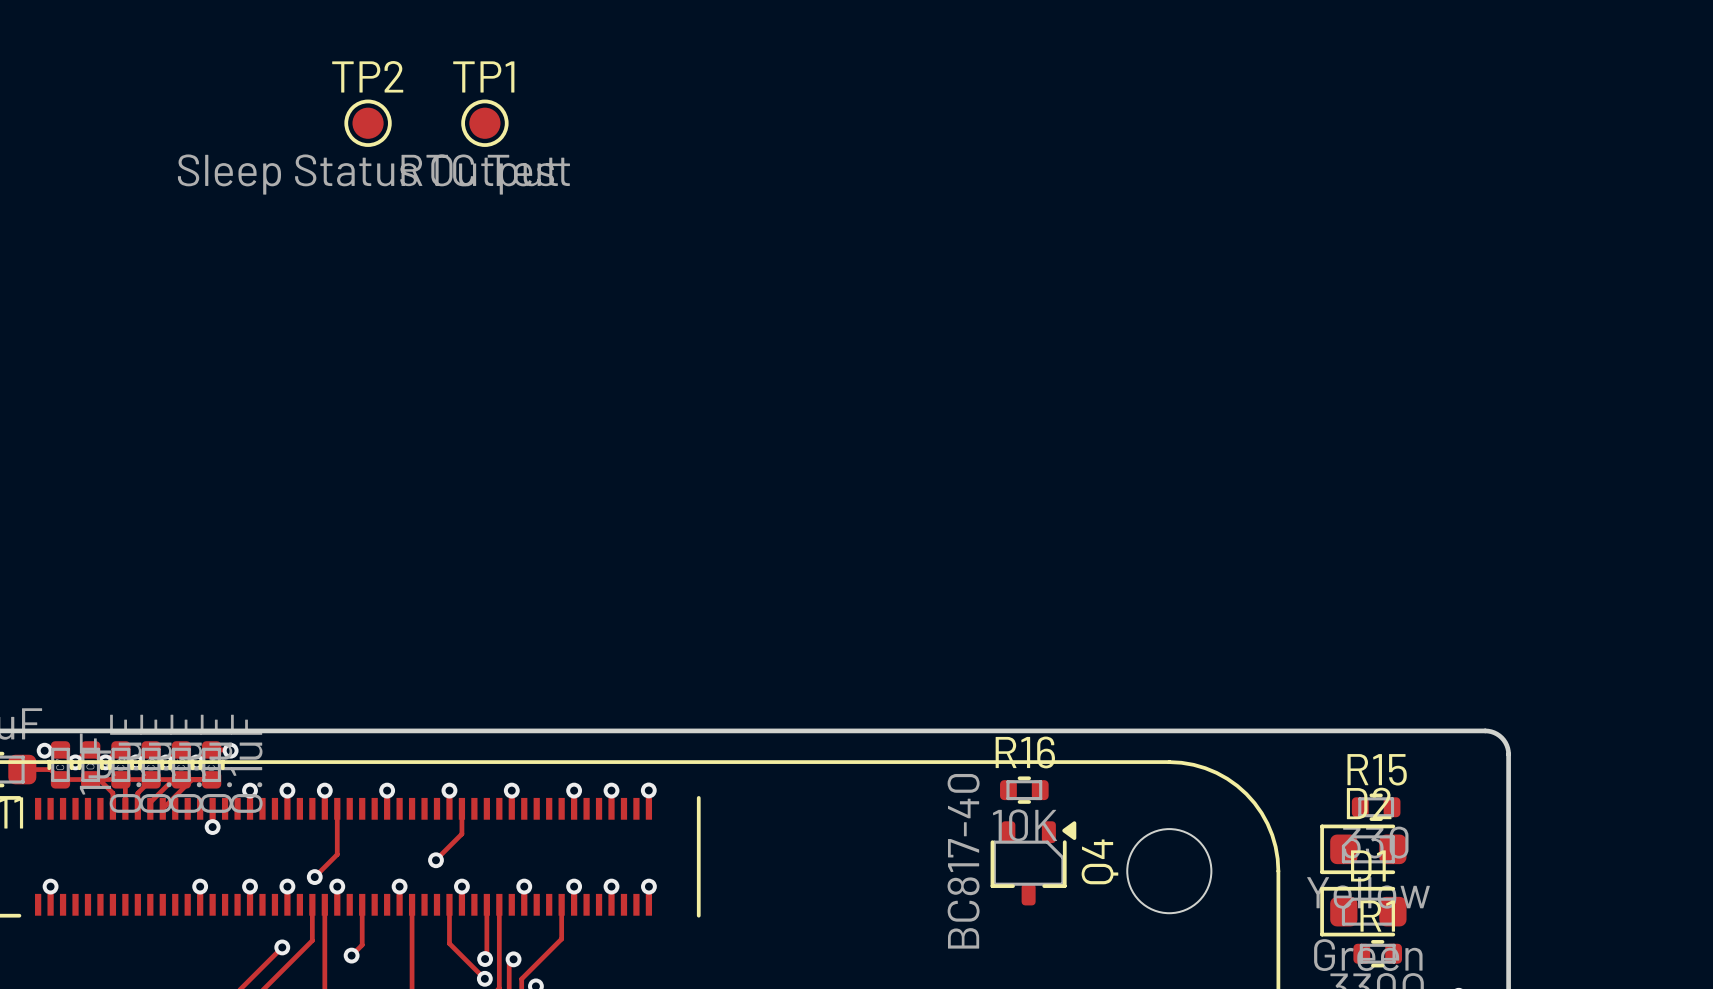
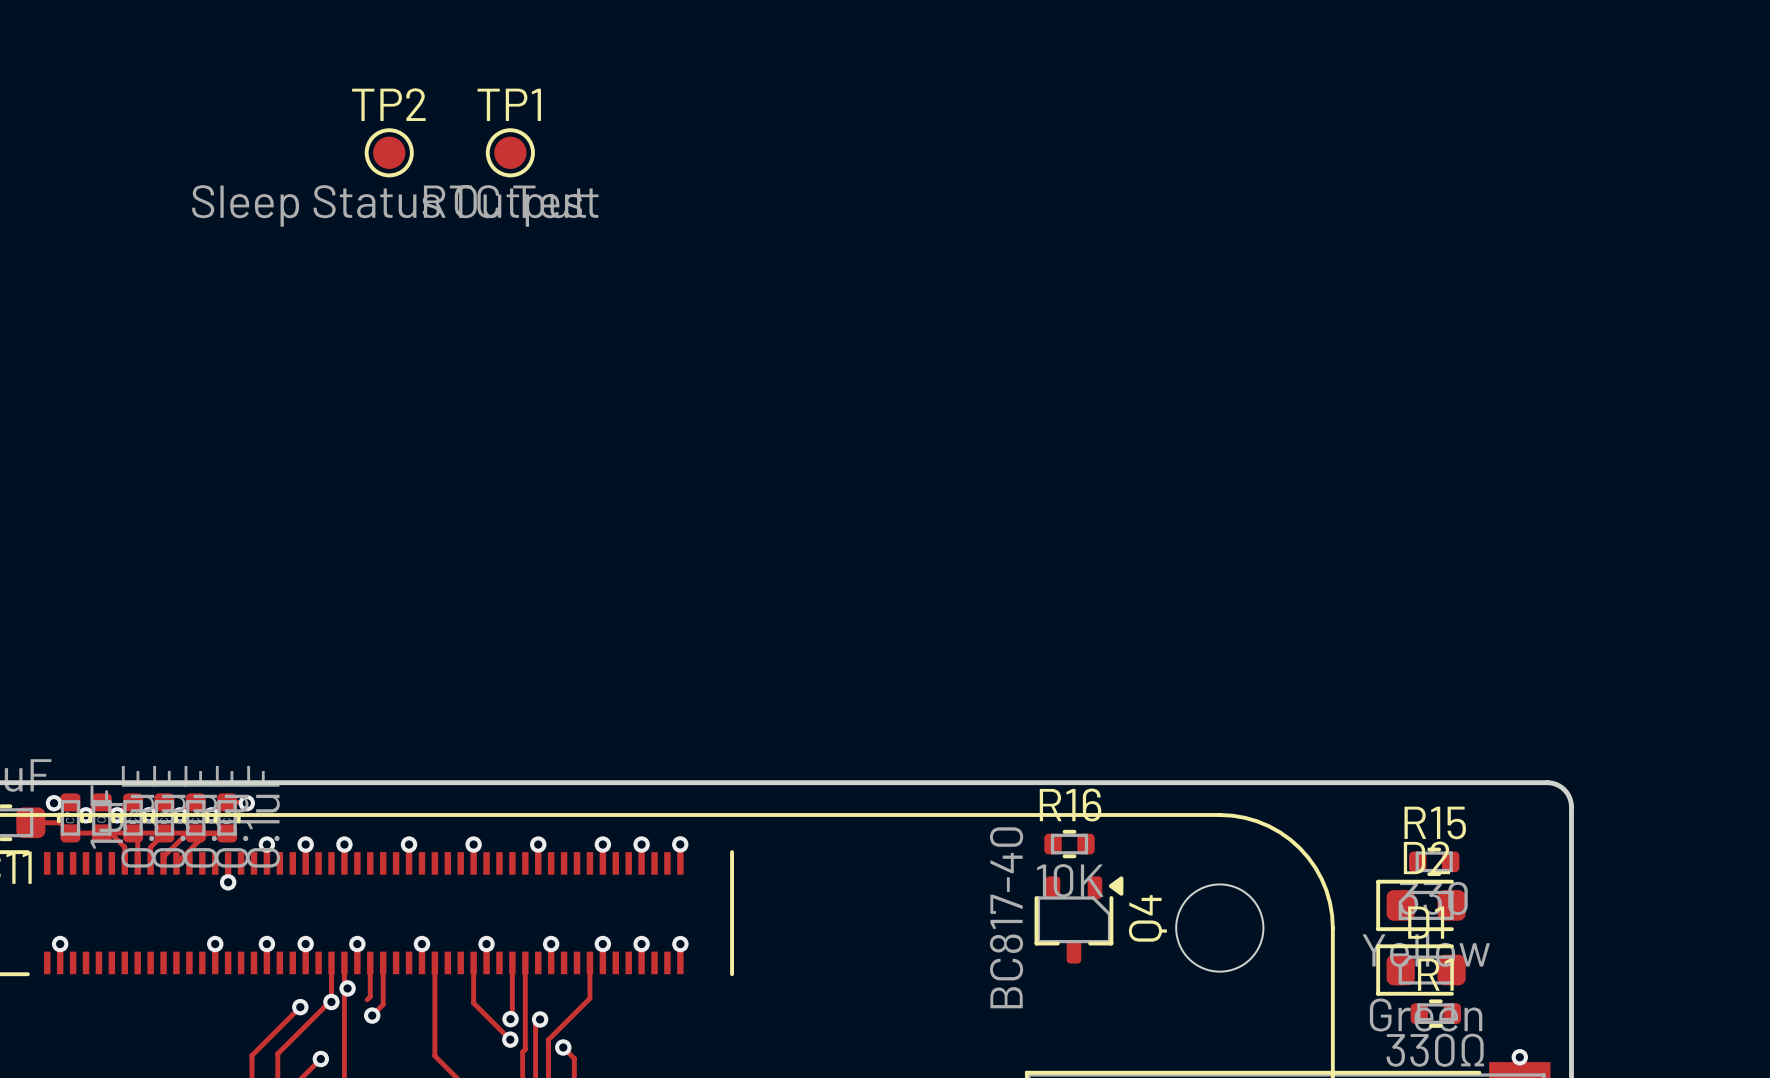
track: (337, 808) (337, 854) (314, 877) -> none
track: (461, 808) (461, 833) (435, 859) -> none
via: (435, 860) -> none
via: (314, 877) -> none
track: none -> (370, 962) (370, 996) (367, 999)
via: none -> (347, 988)
via: none -> (331, 1002)

